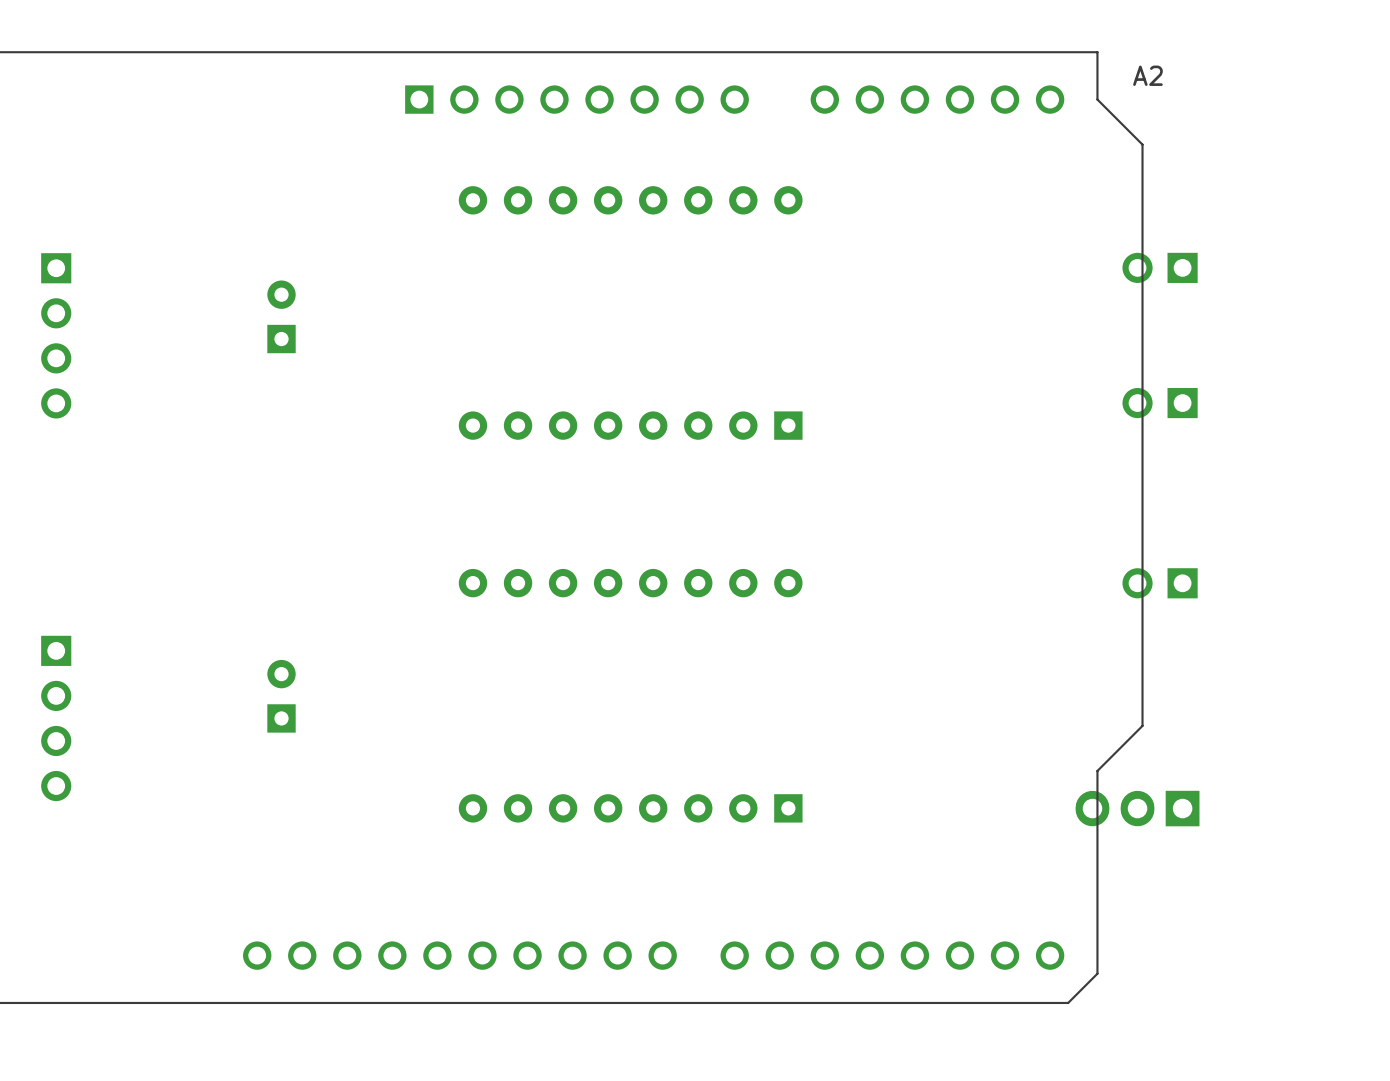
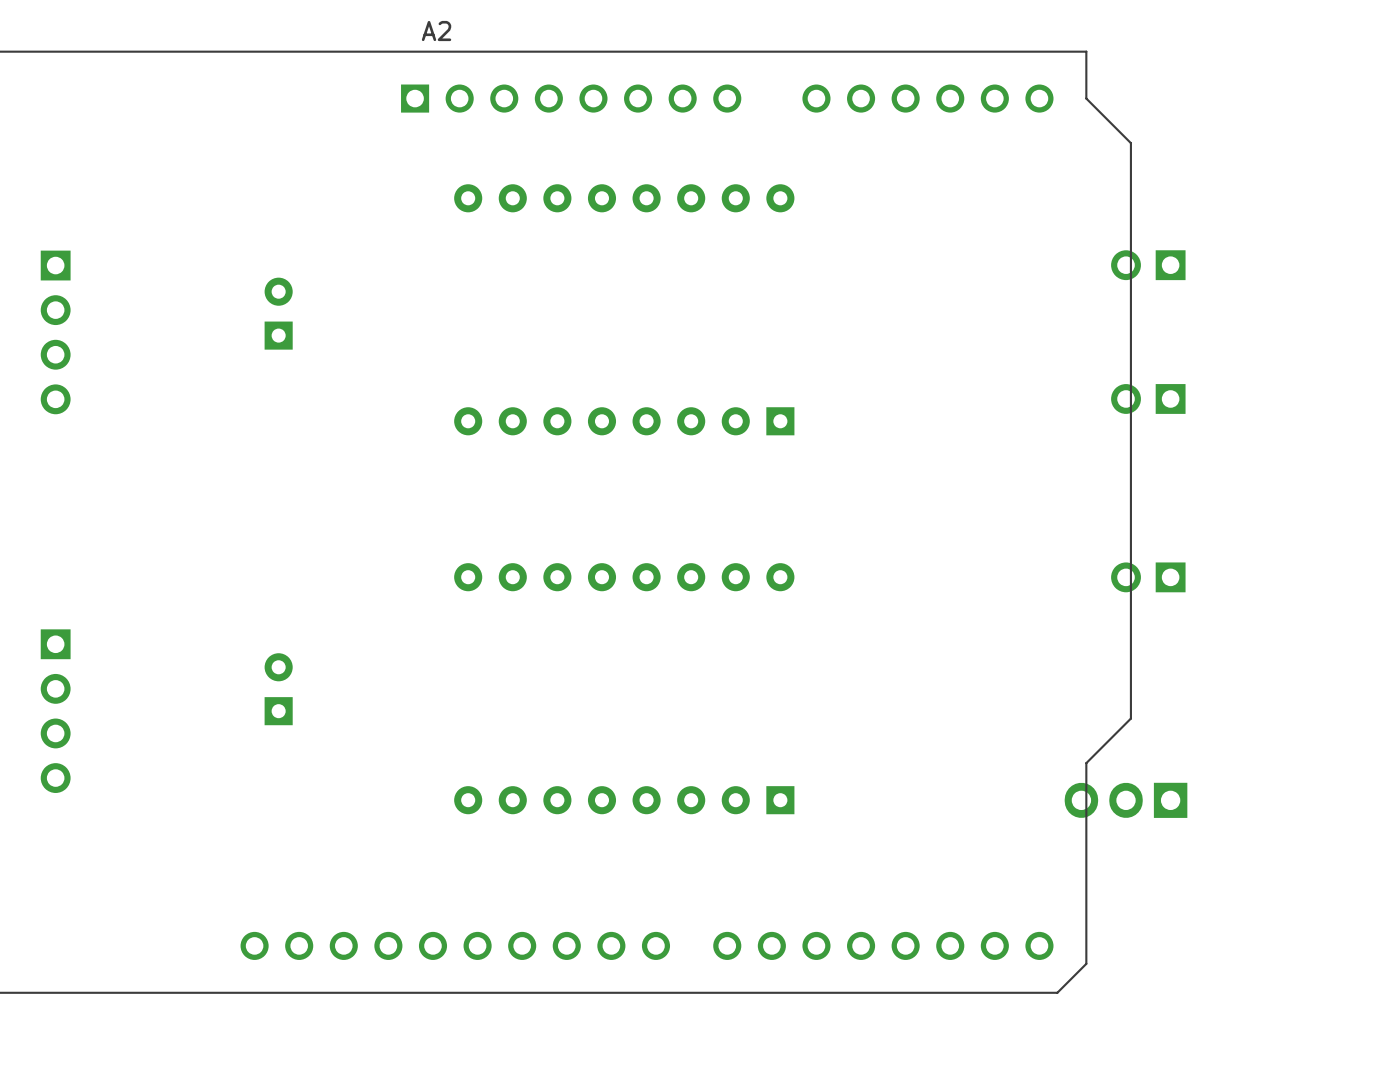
A2 name position: A2 (1147, 75) -> A2 (436, 31)

